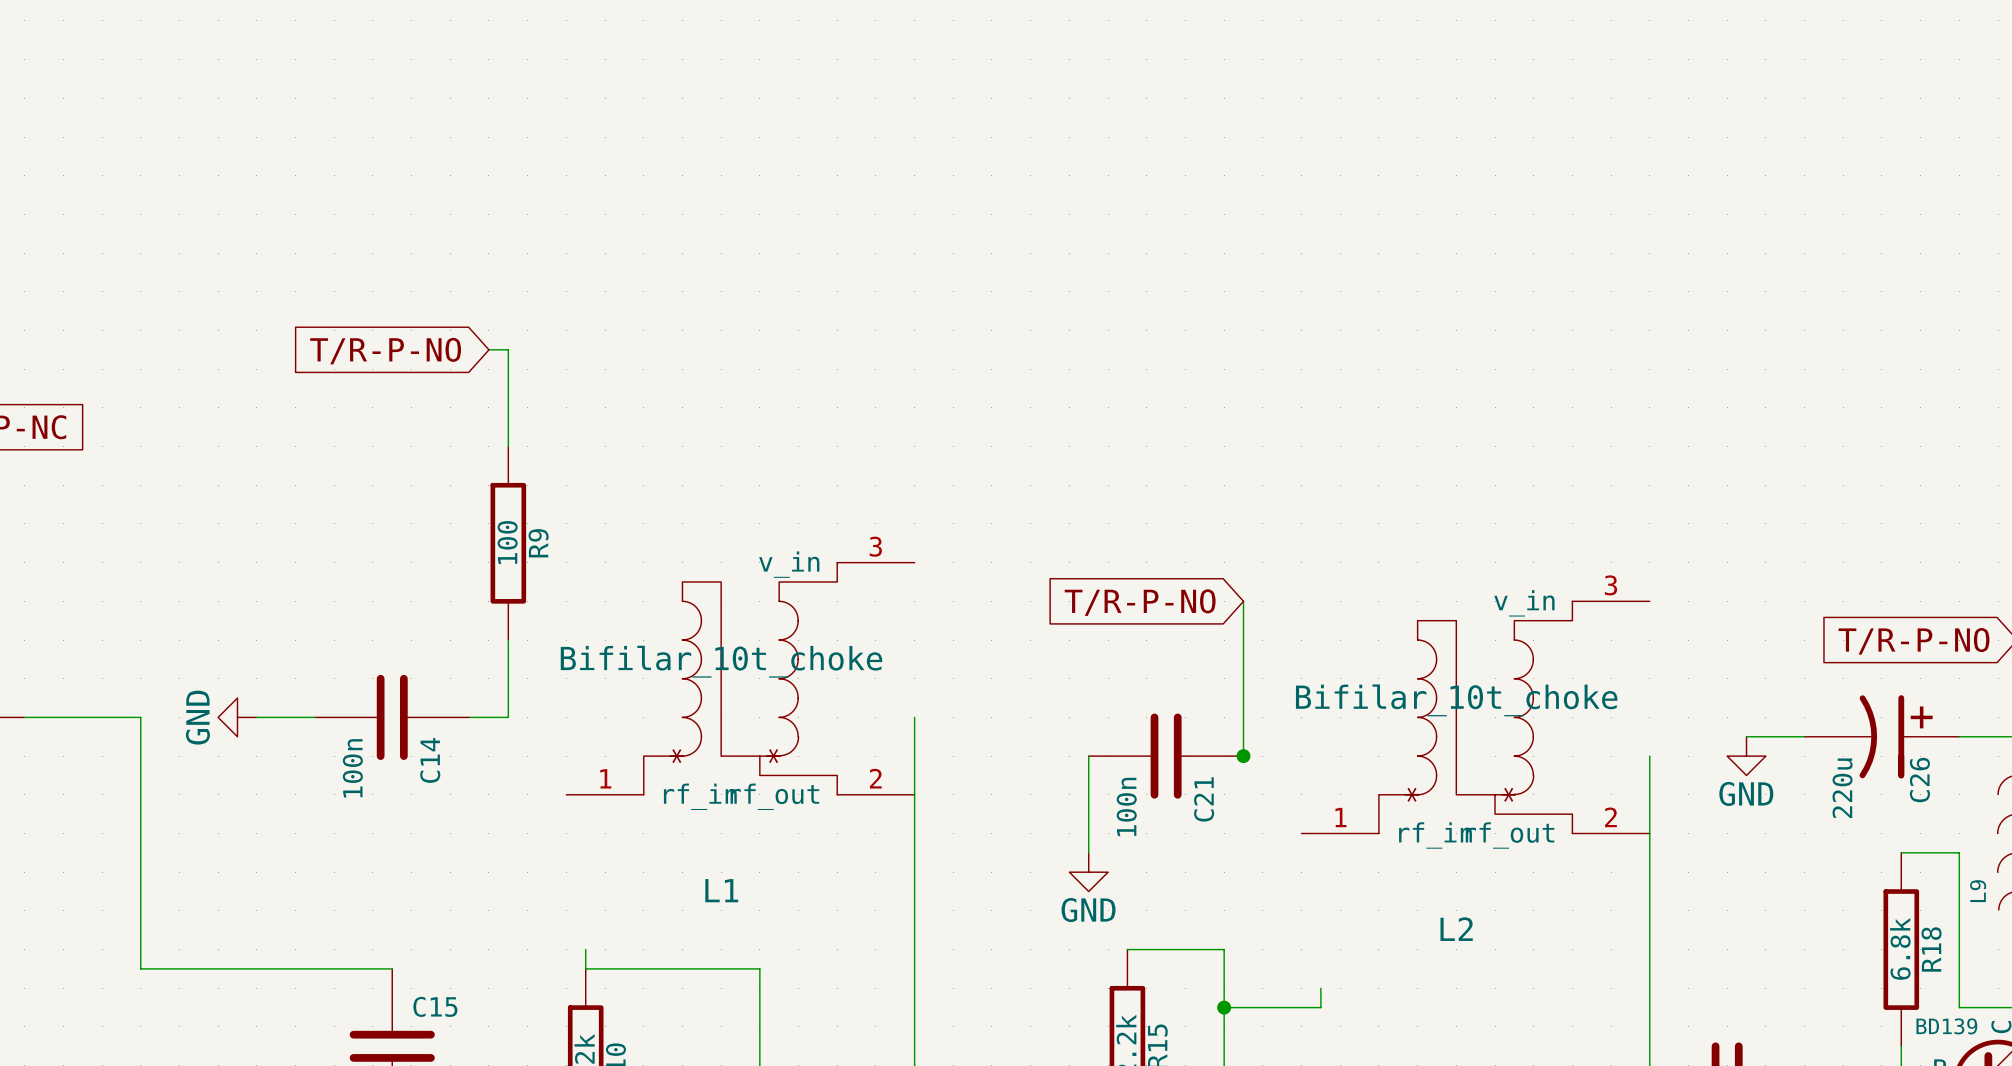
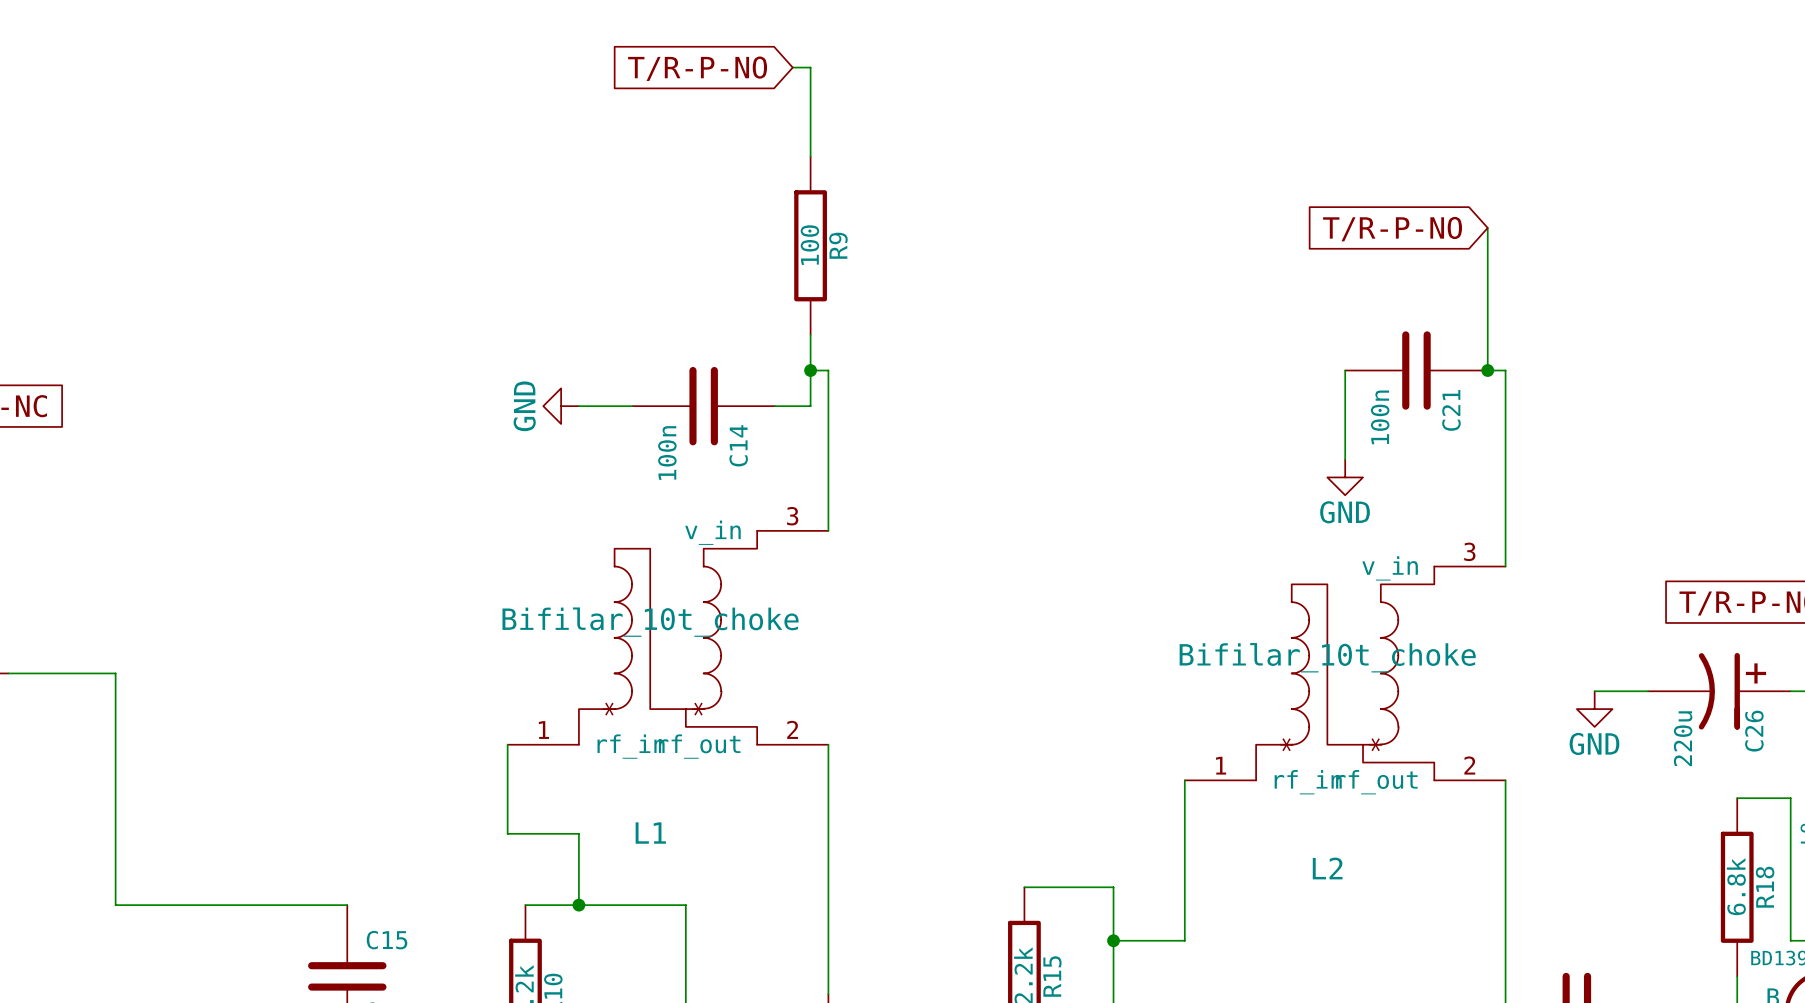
wire: none -> (792, 67) (810, 67) (810, 156)
global label: none -> T/R-P-NO (697, 68)
wire: none -> (1487, 227) (1487, 370) (1505, 370) (1505, 566)
global label: none -> T/R-P-NO (1392, 229)
wire: (488, 349) (508, 349) (508, 446) -> none
wire: none -> (810, 334) (810, 406) (774, 406)
global label: T/R-P-NO (385, 351) -> none
wire: none -> (810, 370) (828, 370) (828, 530)
junction: none -> (810, 370)
wire: none -> (1345, 370) (1345, 459)
junction: none -> (1487, 370)
power symbol: none -> GND (561, 406)
wire: none -> (578, 406) (632, 406)
power symbol: none -> GND (1345, 477)
R9 position: (508, 543) -> (810, 245)
wire: (1243, 601) (1243, 756) -> none
global label: T/R-P-NO (1140, 602) -> none
wire: (508, 640) (508, 717) (469, 717) -> none
power symbol: GND (237, 717) -> none
wire: (256, 717) (314, 717) -> none
C14 position: (392, 717) -> (703, 406)
wire: (914, 717) (914, 794) -> none
wire: (1088, 756) (1088, 852) -> none
C21 position: (1166, 756) -> (1416, 370)
junction: (1243, 756) -> none
wire: (1649, 756) (1649, 833) -> none
wire: none -> (507, 744) (507, 833) (578, 833) (578, 905)
power symbol: GND (1088, 872) -> none
wire: (585, 949) (585, 968) -> none
junction: none -> (578, 905)
wire: (1320, 988) (1320, 1007) (1301, 1007) -> (1184, 780) (1184, 940)

